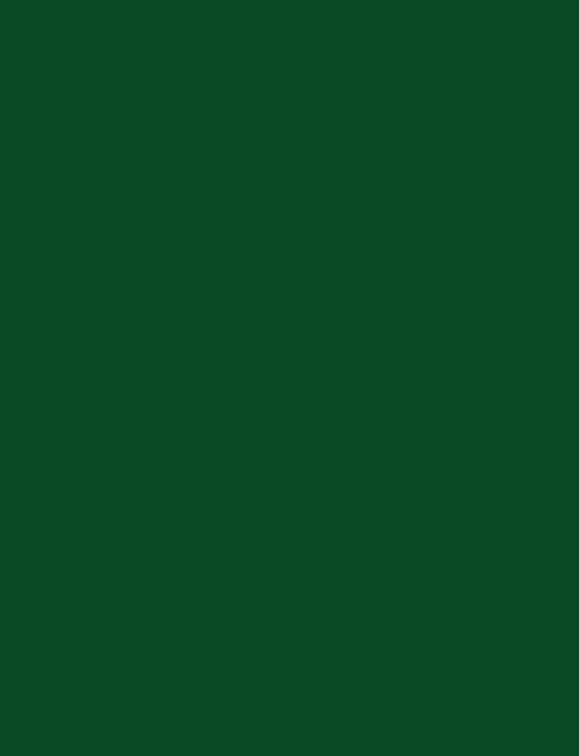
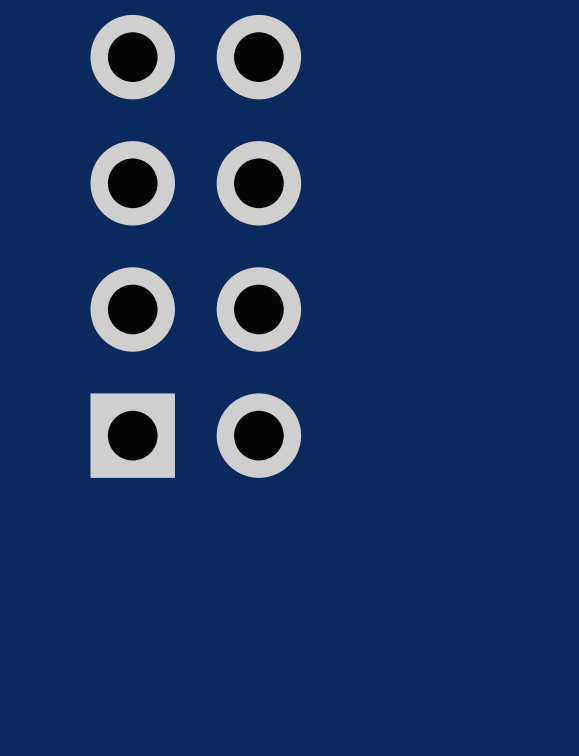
part: none -> (195, 246)

